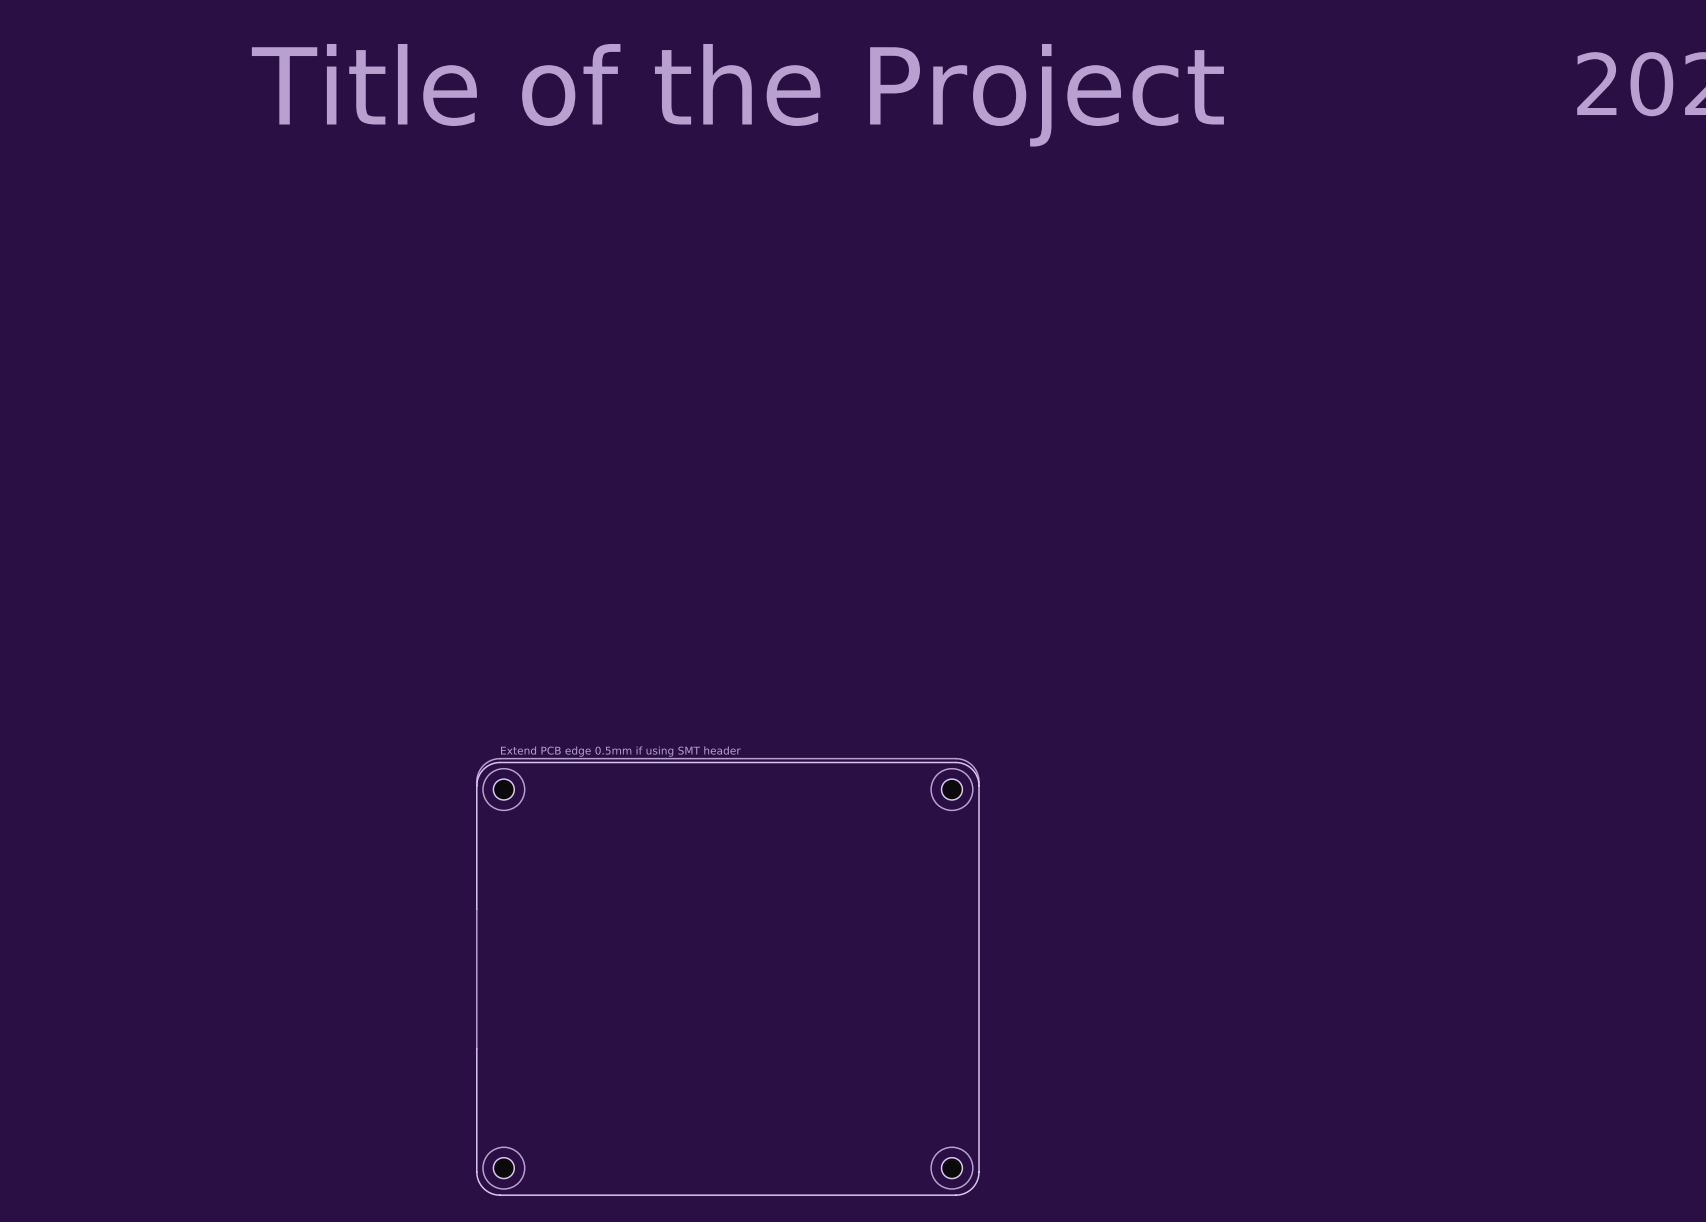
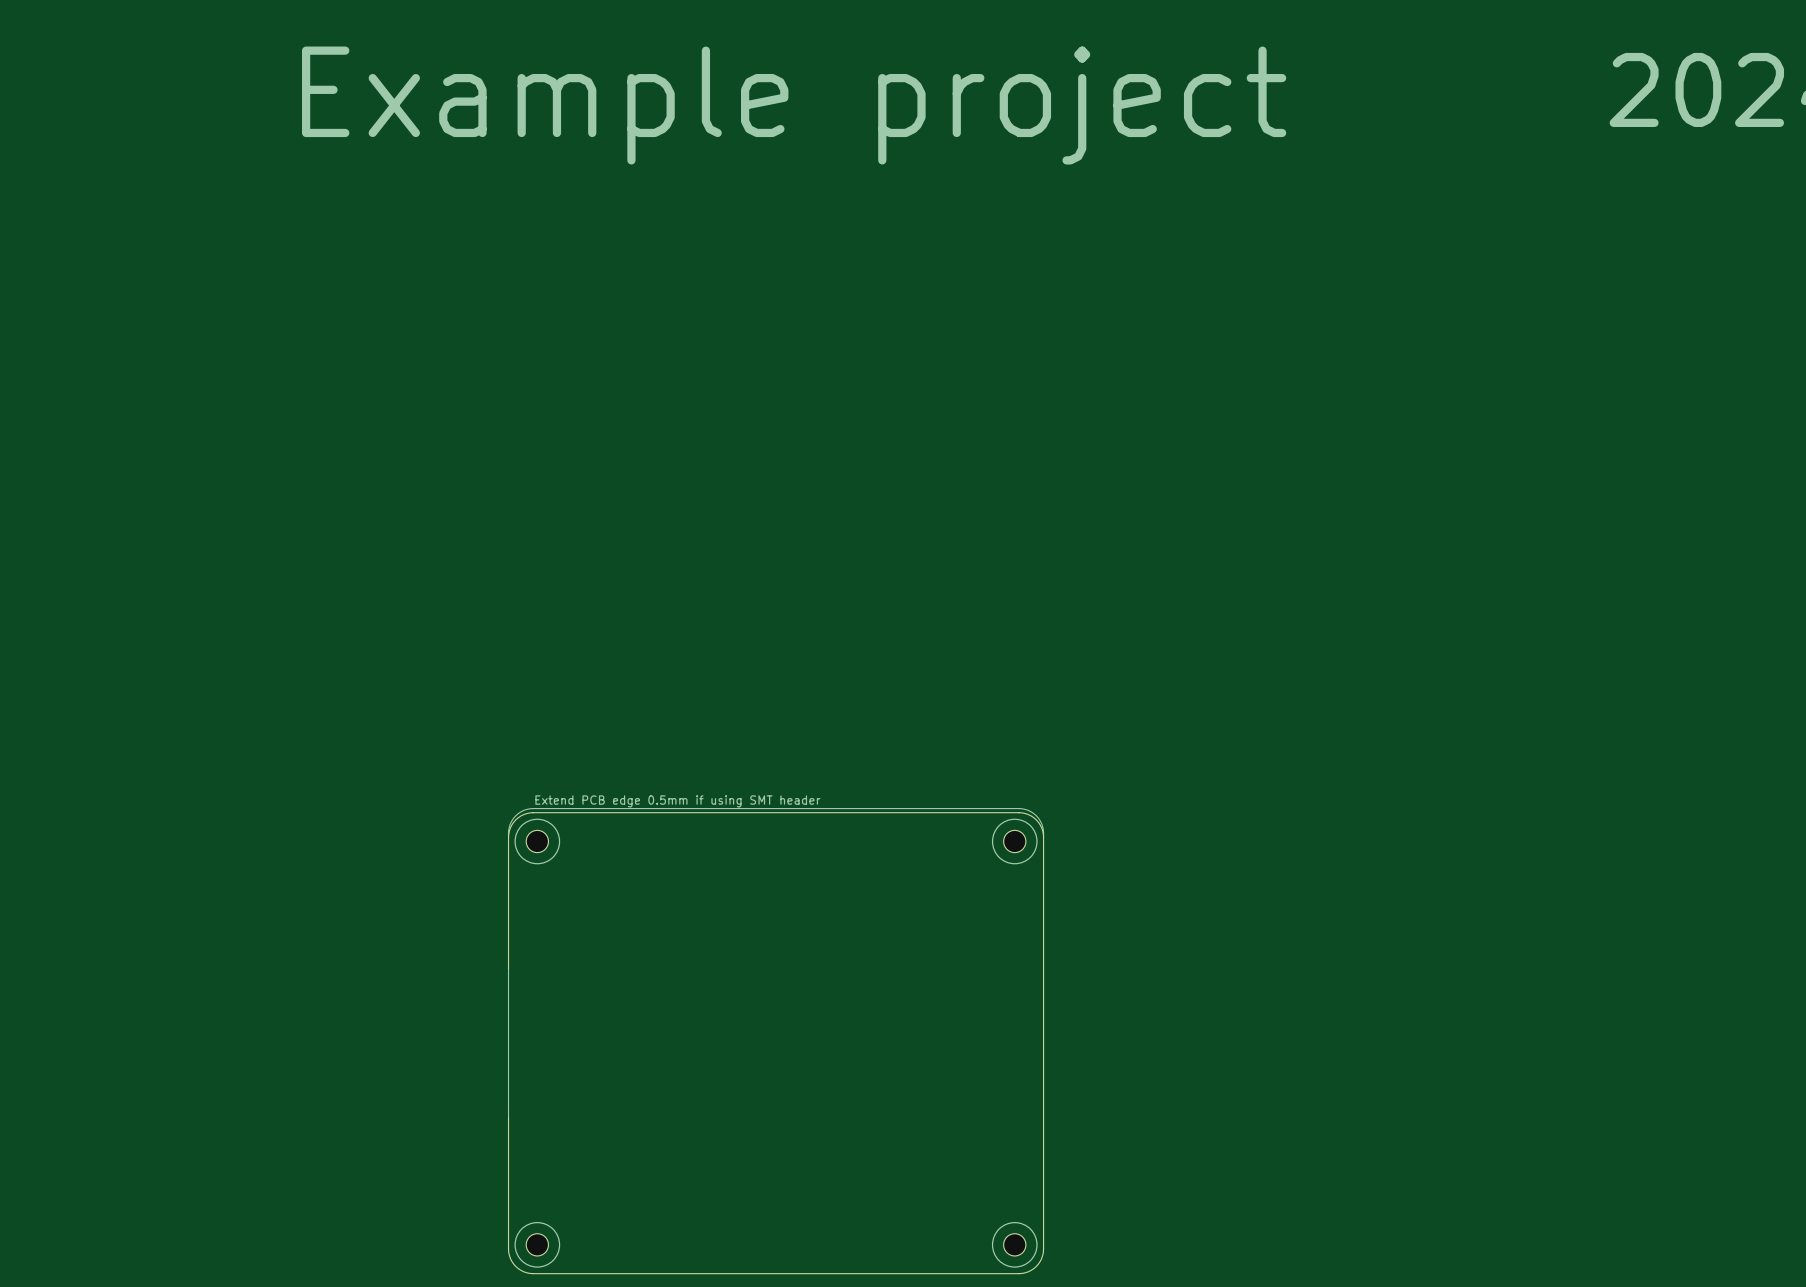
text: Title of the Project (737, 95) -> Example project (794, 105)

